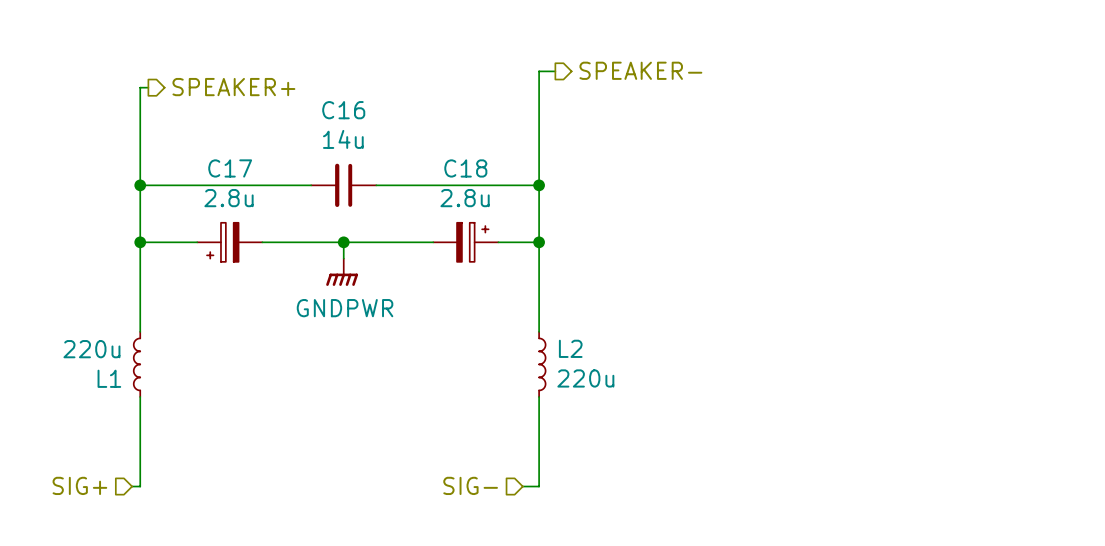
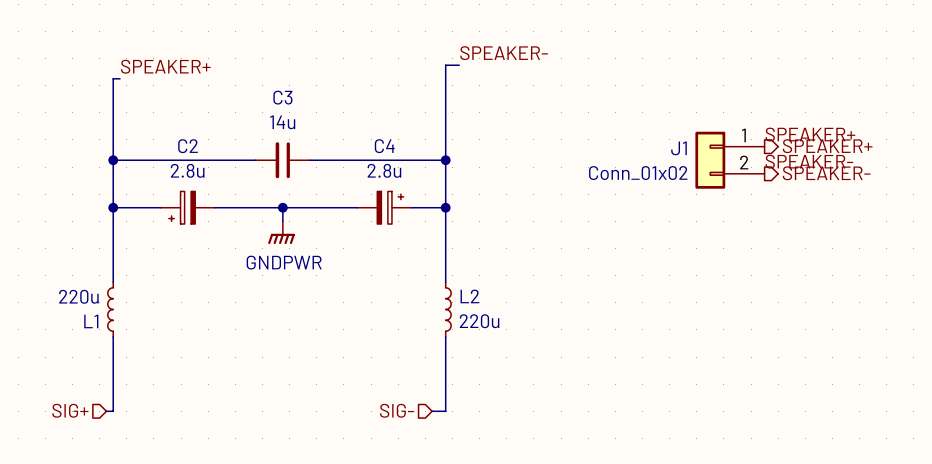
label: none -> SPEAKER- (504, 53)
hierarchical label: SPEAKER- (640, 70) -> none
label: none -> SPEAKER+ (165, 66)
hierarchical label: SPEAKER+ (233, 87) -> none
C16 name: C16 (343, 110) -> C3 (282, 97)
label: none -> SPEAKER+ (810, 134)
C17 name: C17 (230, 168) -> C2 (187, 146)
C18 name: C18 (465, 168) -> C4 (384, 146)
hierarchical label: none -> SPEAKER+ (827, 146)
J1: none -> Conn_01x02 (730, 160)
label: none -> SPEAKER- (809, 161)
hierarchical label: none -> SPEAKER- (826, 173)

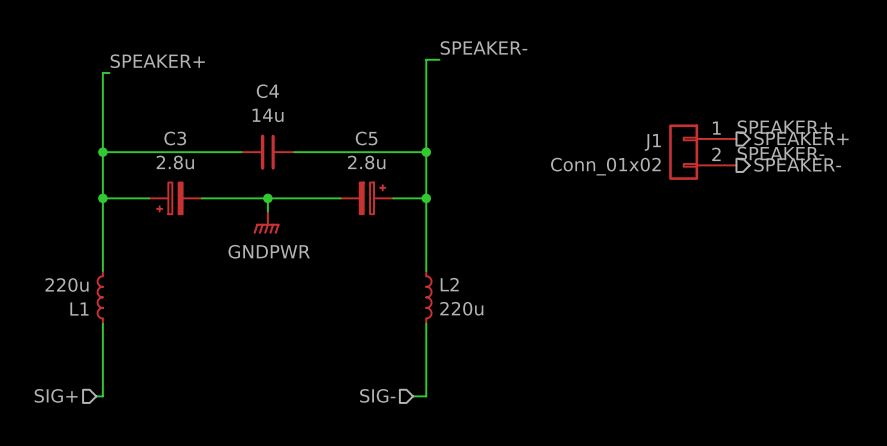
C3 name: C3 (282, 97) -> C4 (267, 91)
C2 name: C2 (187, 146) -> C3 (175, 138)
C4 name: C4 (384, 146) -> C5 (366, 138)

